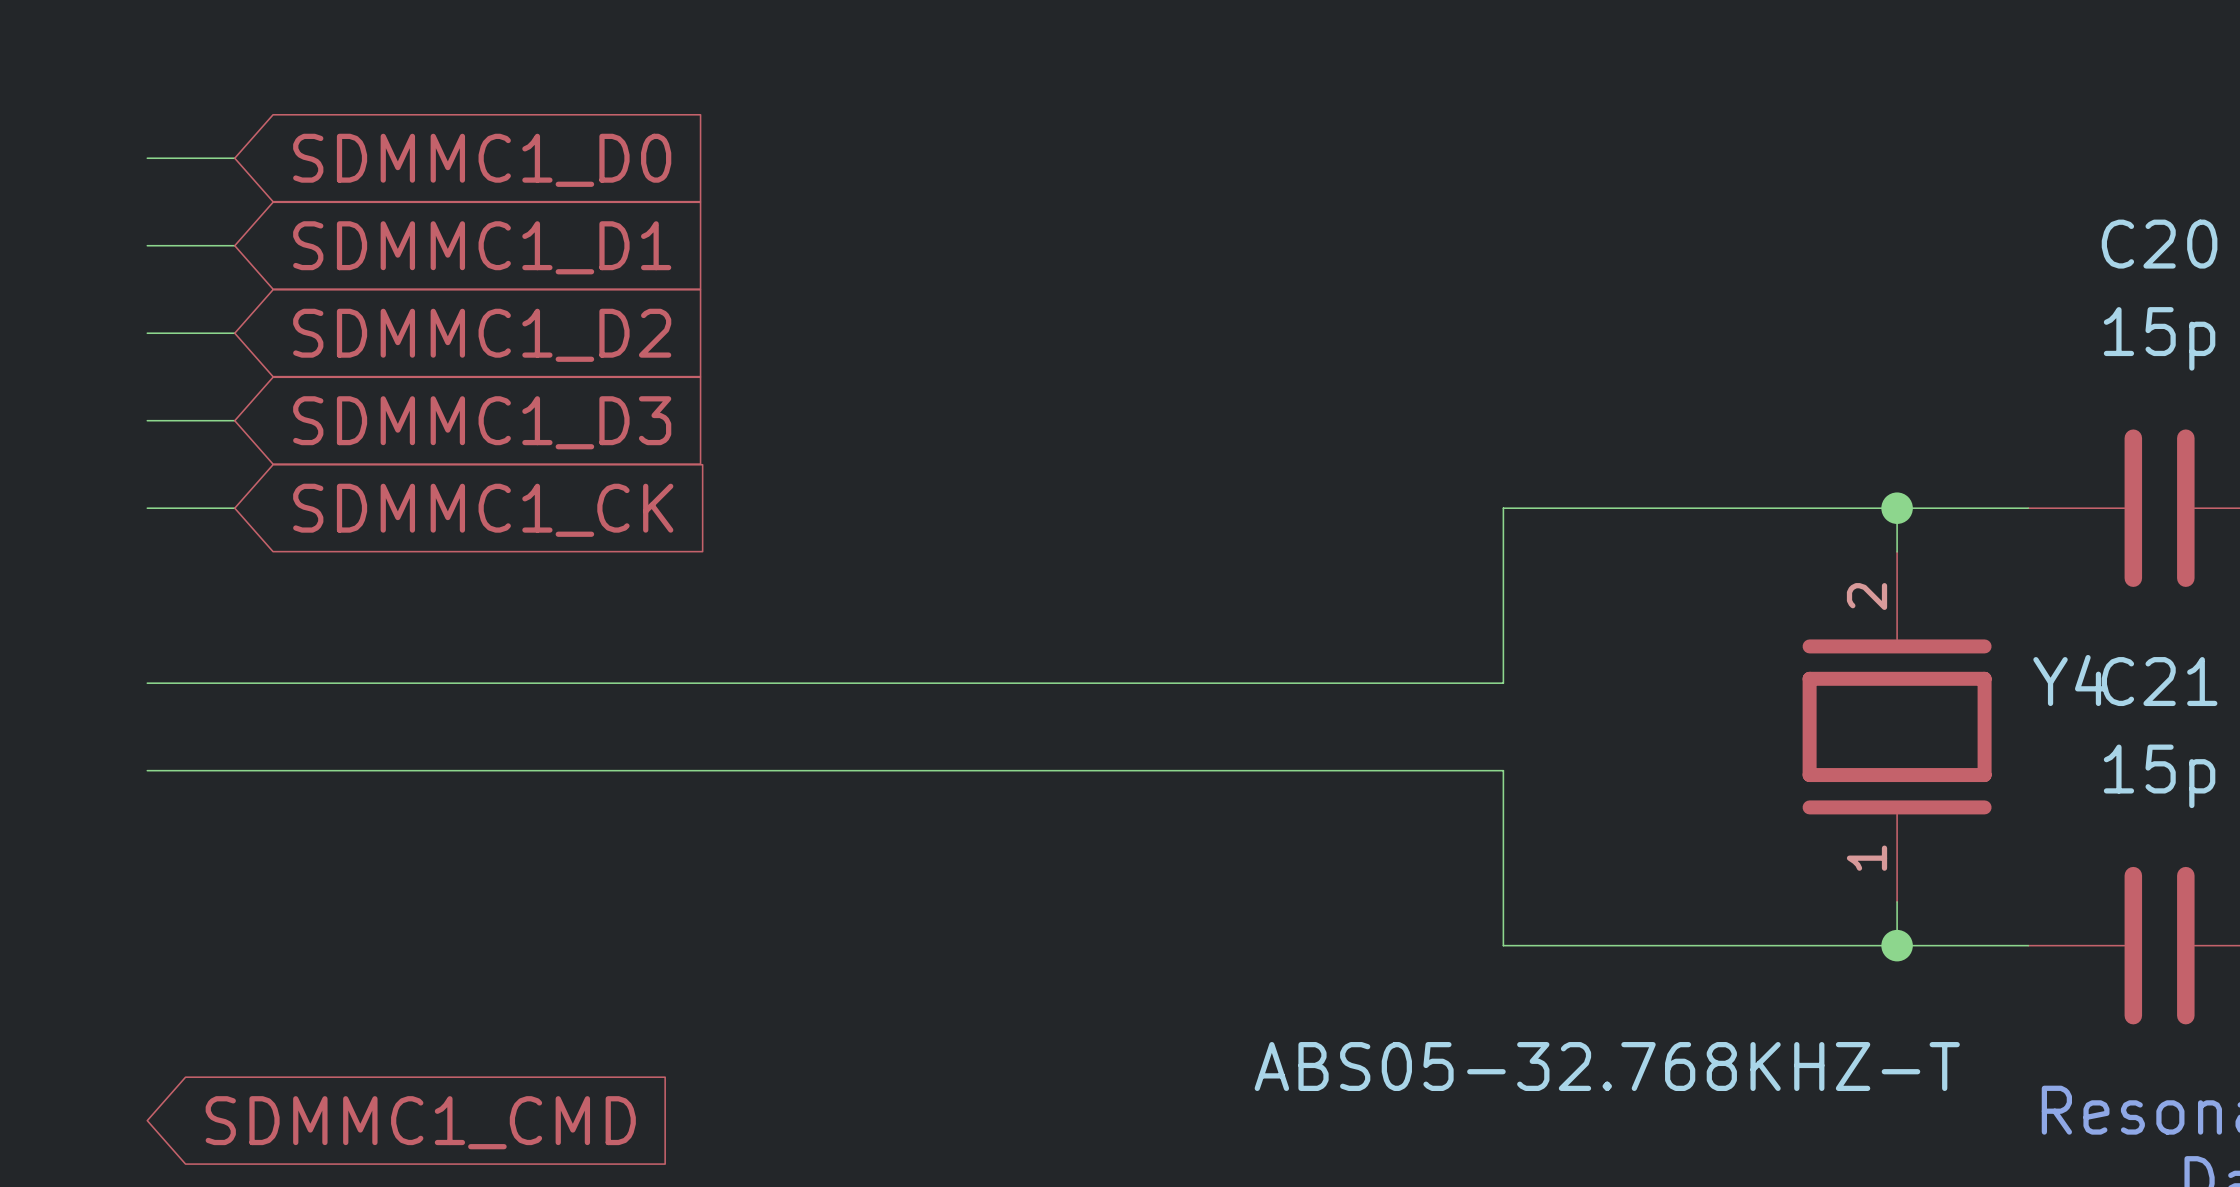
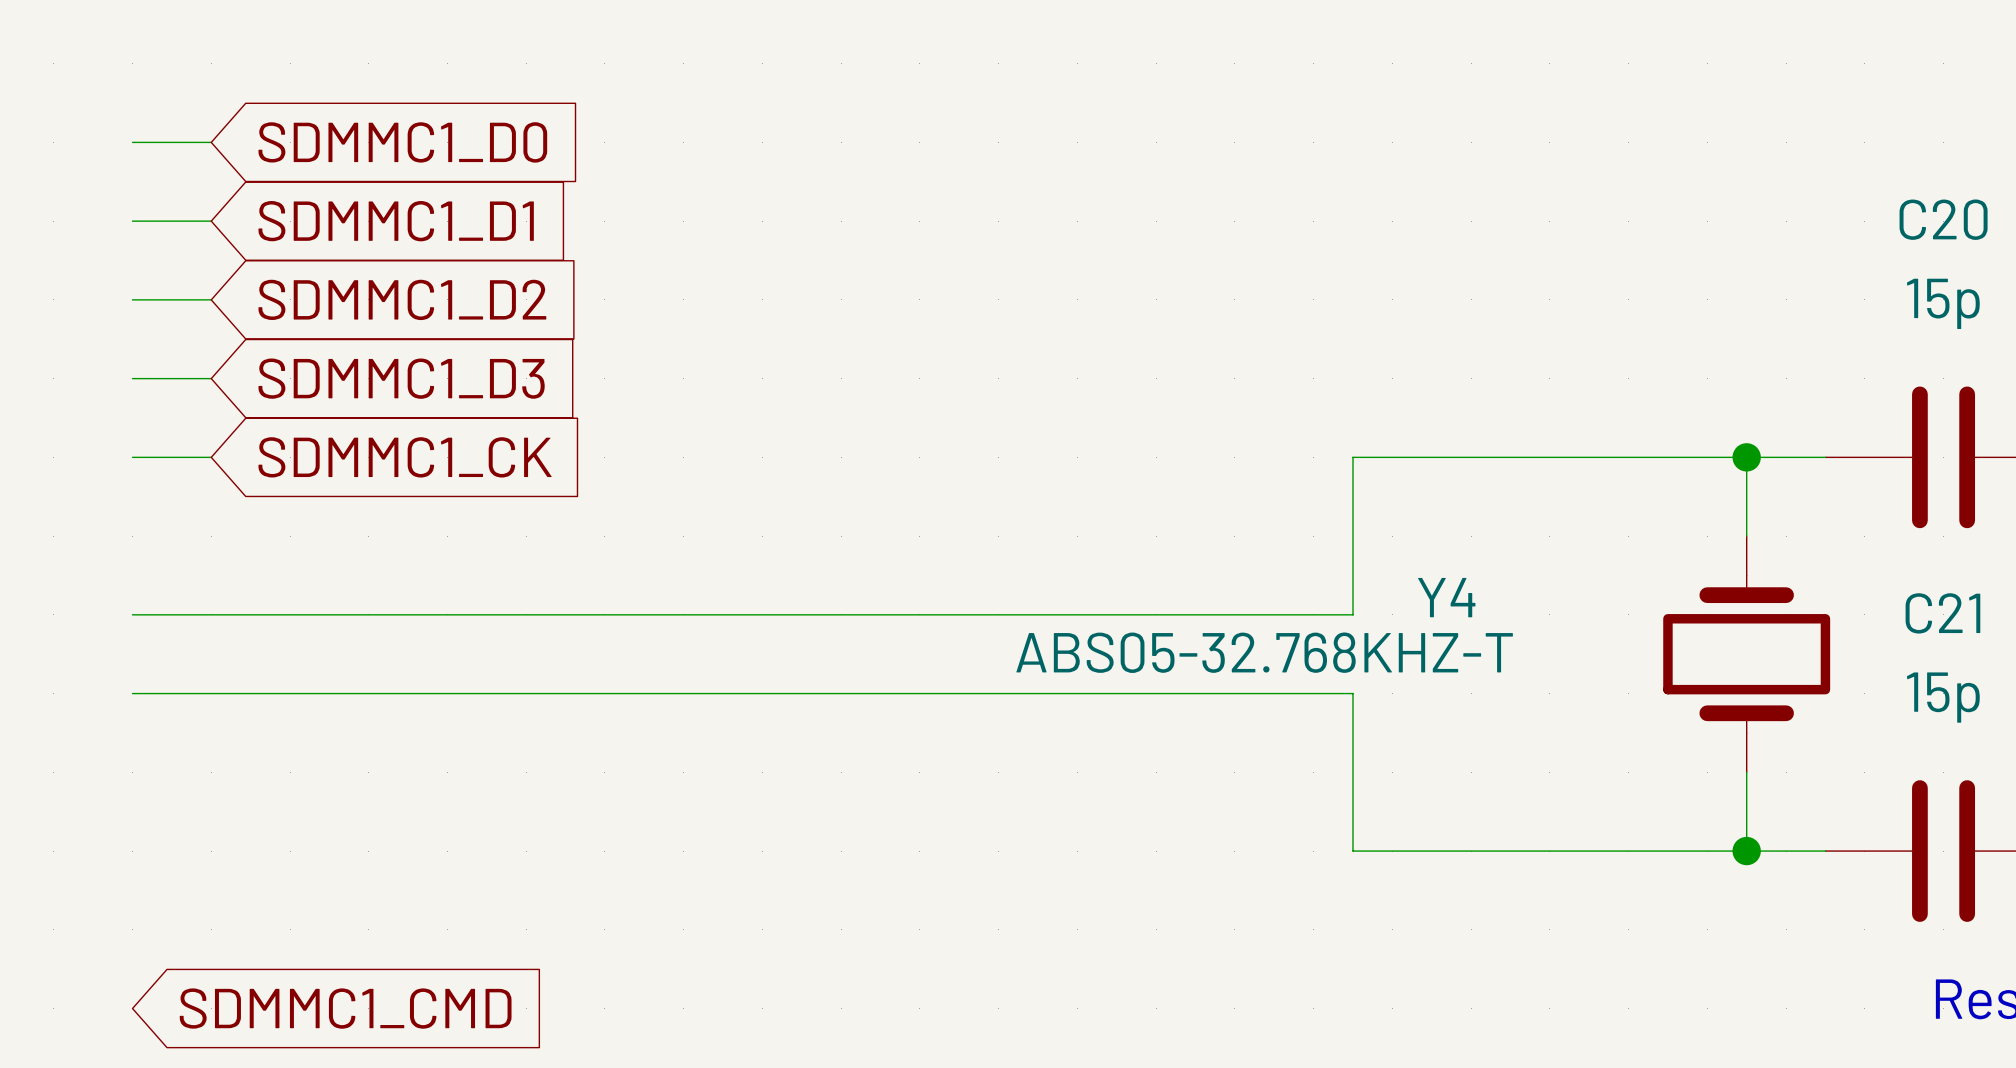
wire: (1897, 508) (1897, 551) -> none
junction position: (1897, 508) -> (1746, 457)
wire: none -> (1746, 457) (1746, 536)
Y4 symbol: [1802, 551, 1992, 902] -> [1663, 536, 1831, 773]
Y4 name position: Y4 (2070, 680) -> Y4 (1446, 597)
wire: none -> (1746, 772) (1746, 851)
wire: (1897, 901) (1897, 945) -> none
junction position: (1897, 945) -> (1746, 851)
Y4 value position: ABS05-32.768KHZ-T (1607, 1066) -> ABS05-32.768KHZ-T (1264, 652)

